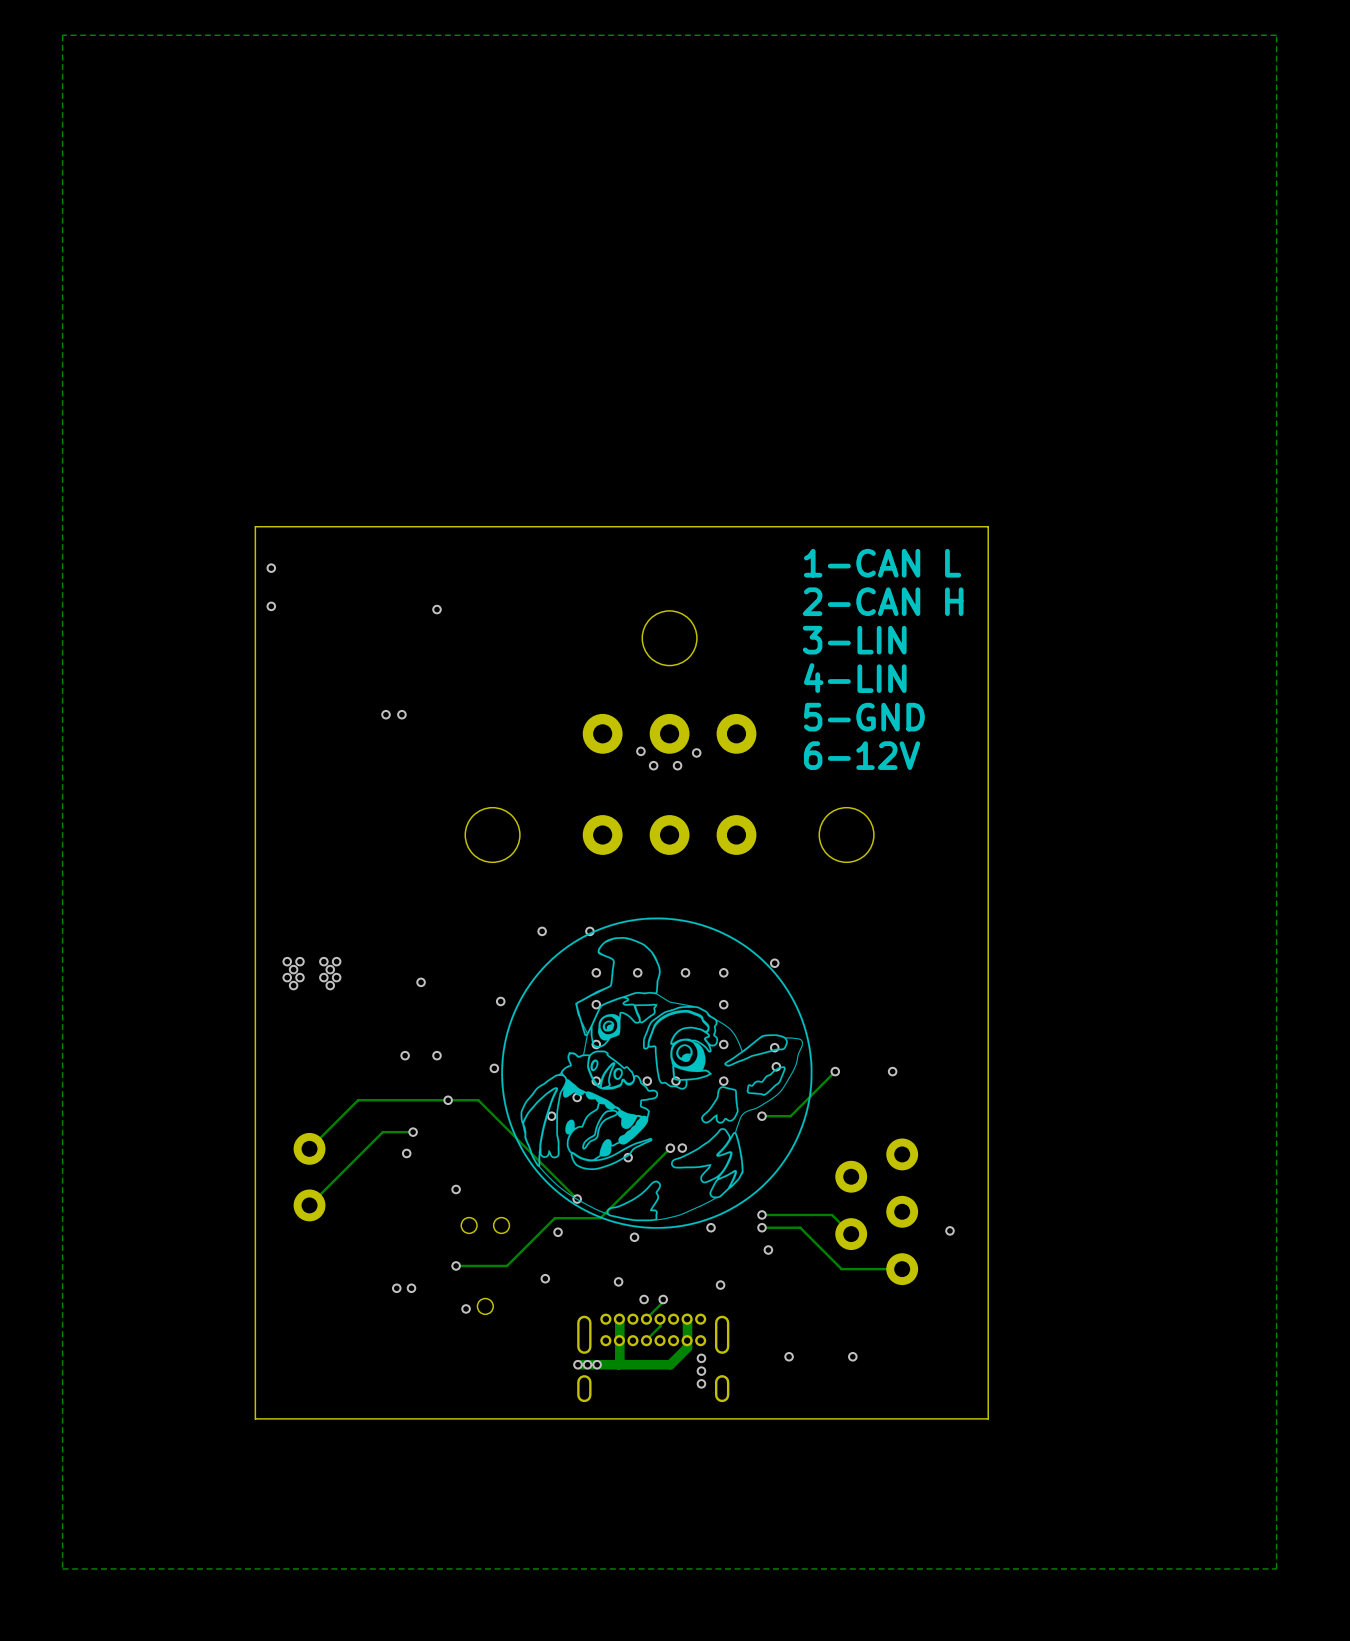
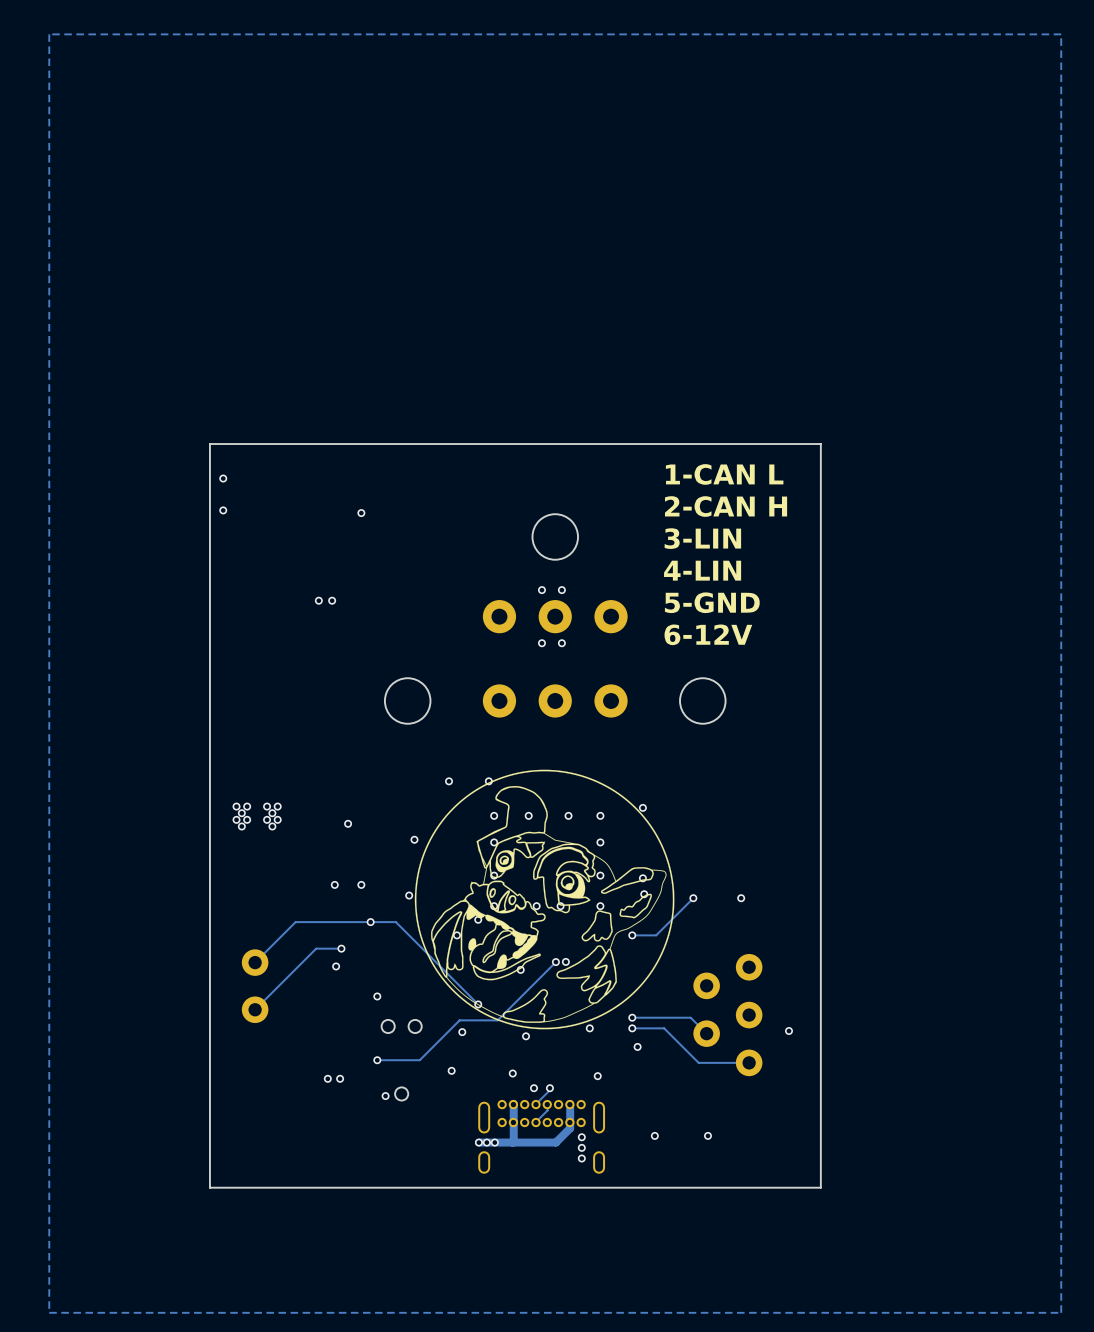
via: none -> (541, 590)
via: none -> (561, 590)
via: (640, 751) -> none
via: (696, 752) -> none

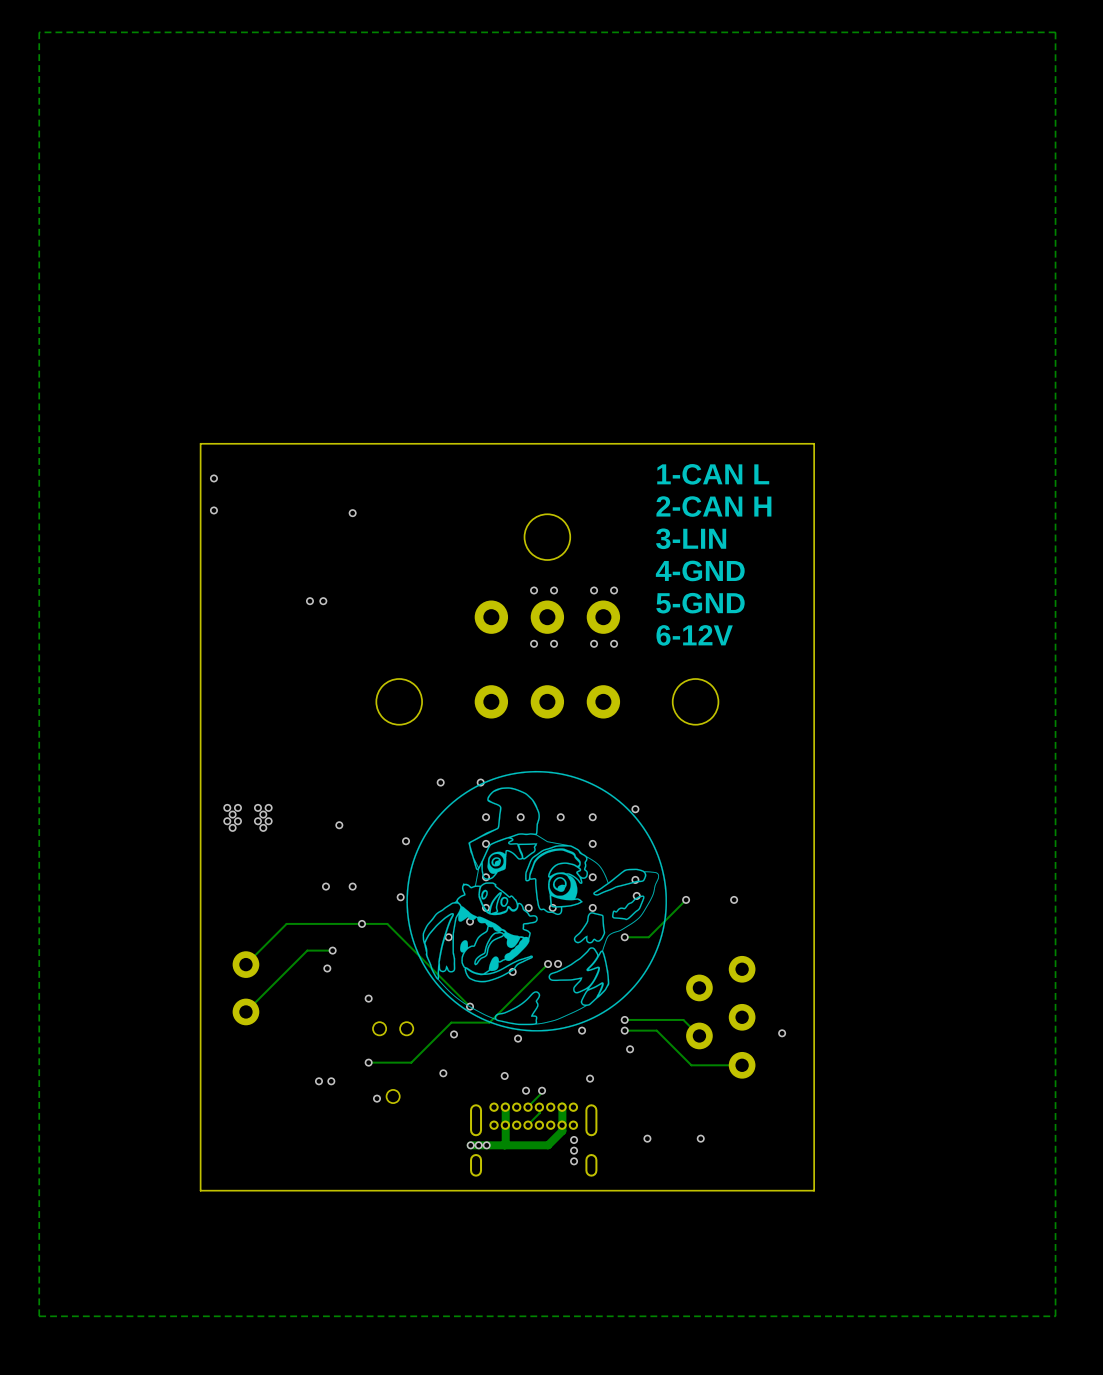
text: 4-LIN (702, 570) -> 4-GND (700, 570)
via: none -> (594, 590)
via: none -> (614, 590)
via: none -> (594, 643)
via: none -> (614, 643)

